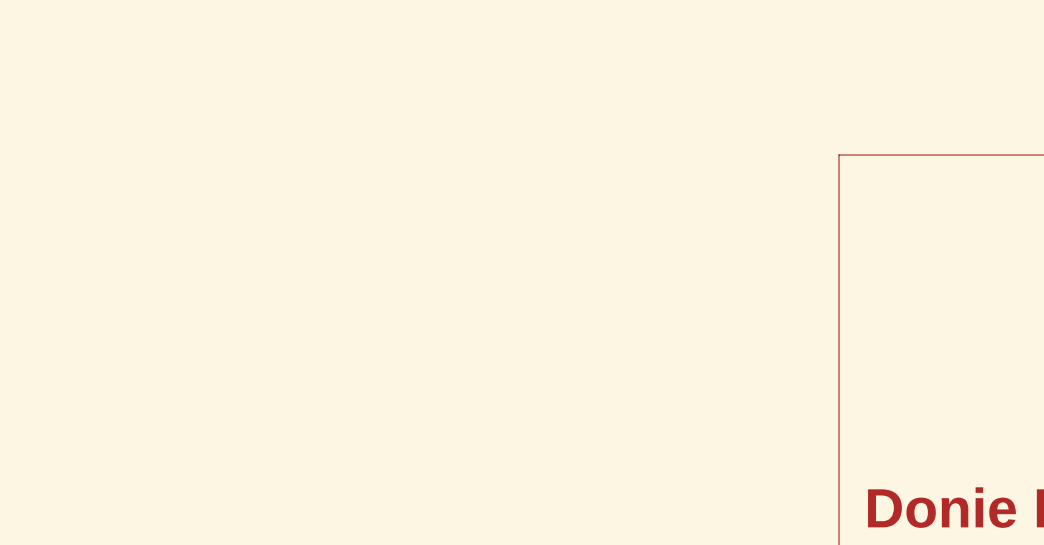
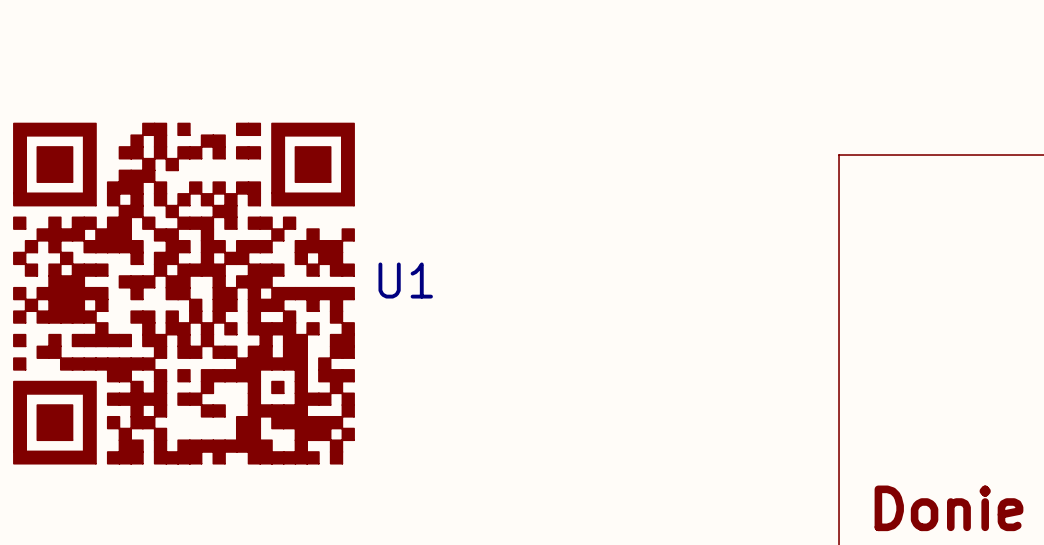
U1: none -> (183, 293)

